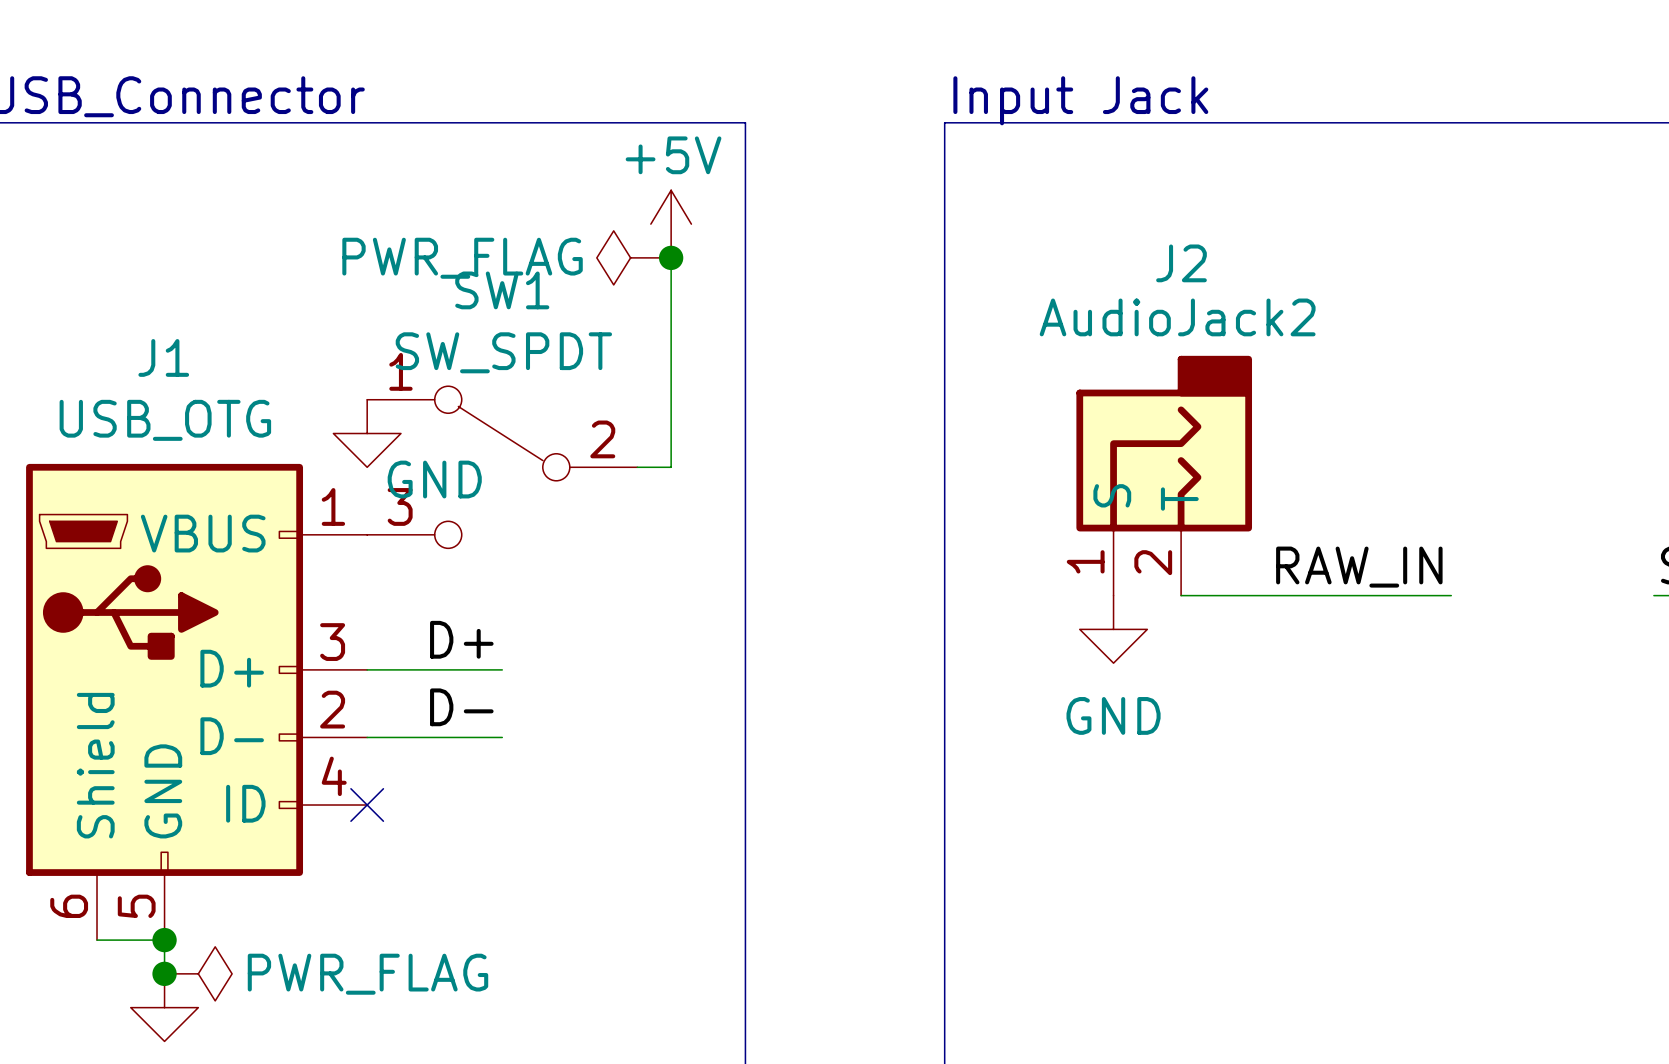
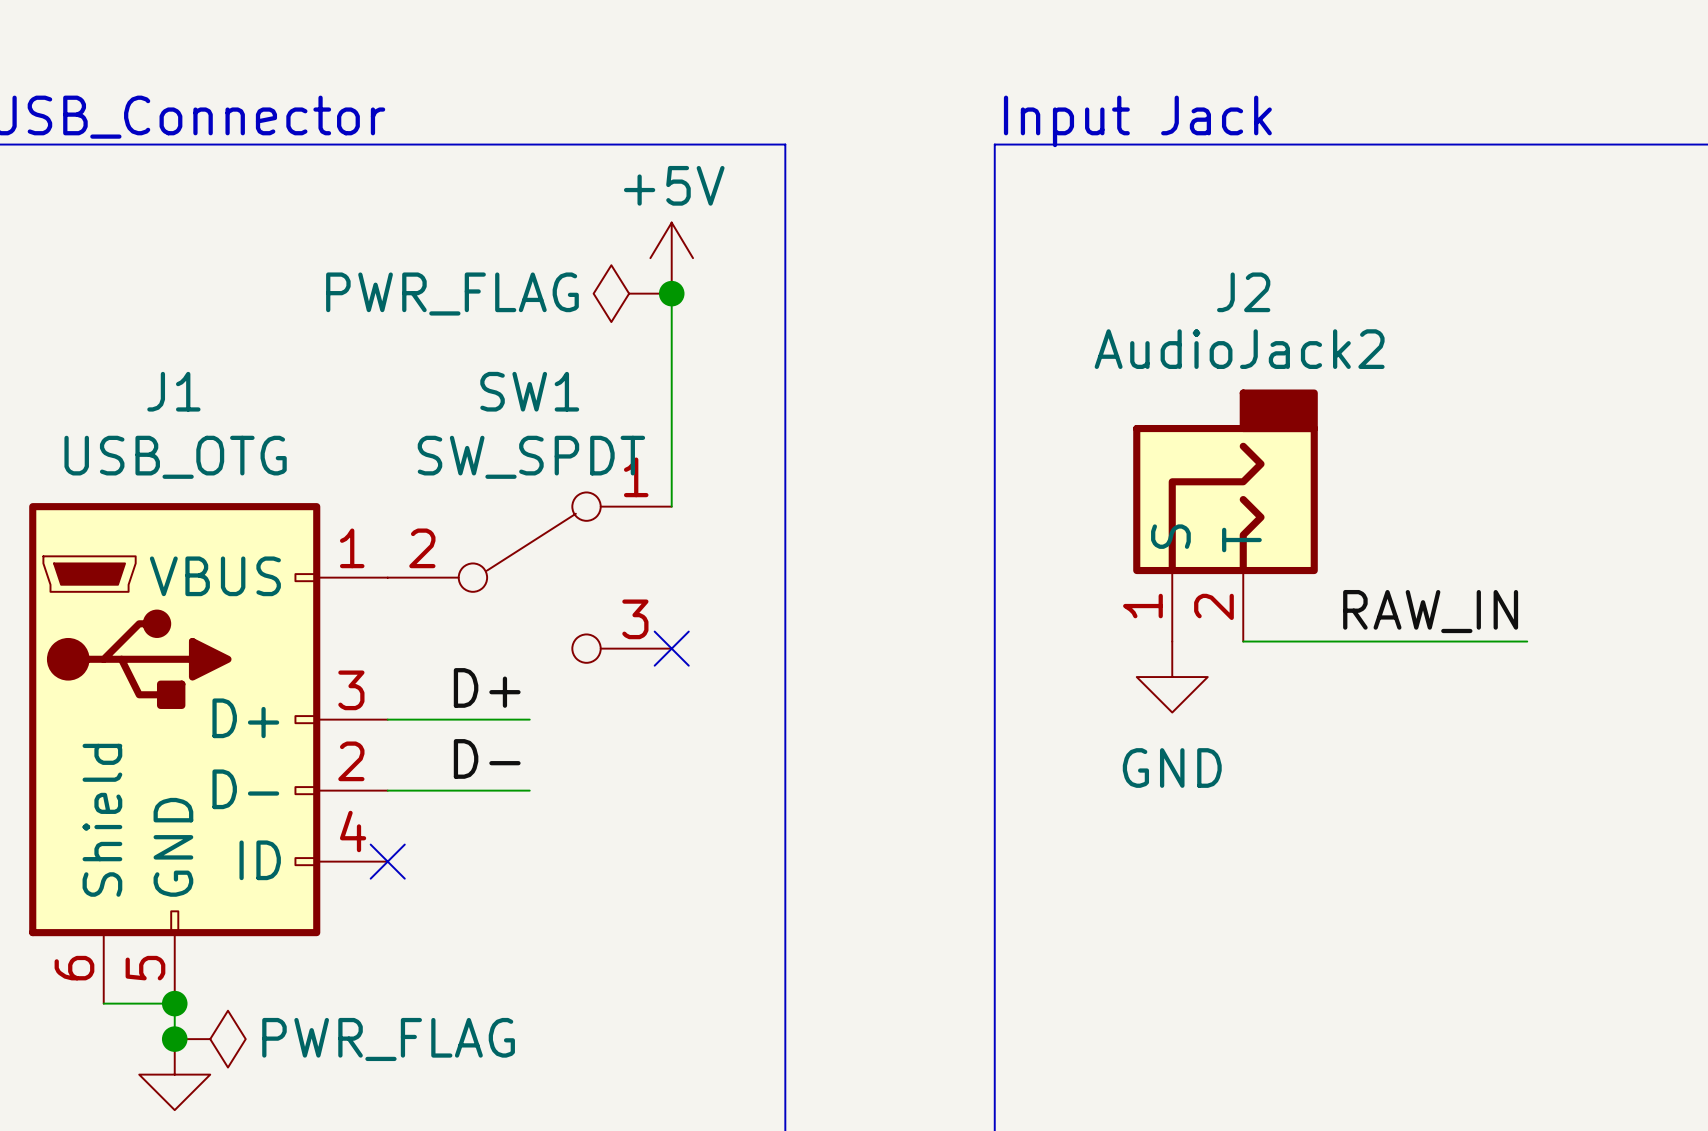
power symbol position: +5V (671, 224) -> +5V (671, 258)
power symbol position: PWR_FLAG (630, 257) -> PWR_FLAG (629, 293)
wire: (664, 257) (671, 257) (671, 467) (637, 467) -> (664, 293) (671, 293) (671, 506)
junction position: (671, 257) -> (671, 293)
power symbol: GND (367, 433) -> none
SW1 flip: as is (502, 467) -> left-right (529, 577)
no-connect mark: none -> (671, 648)

